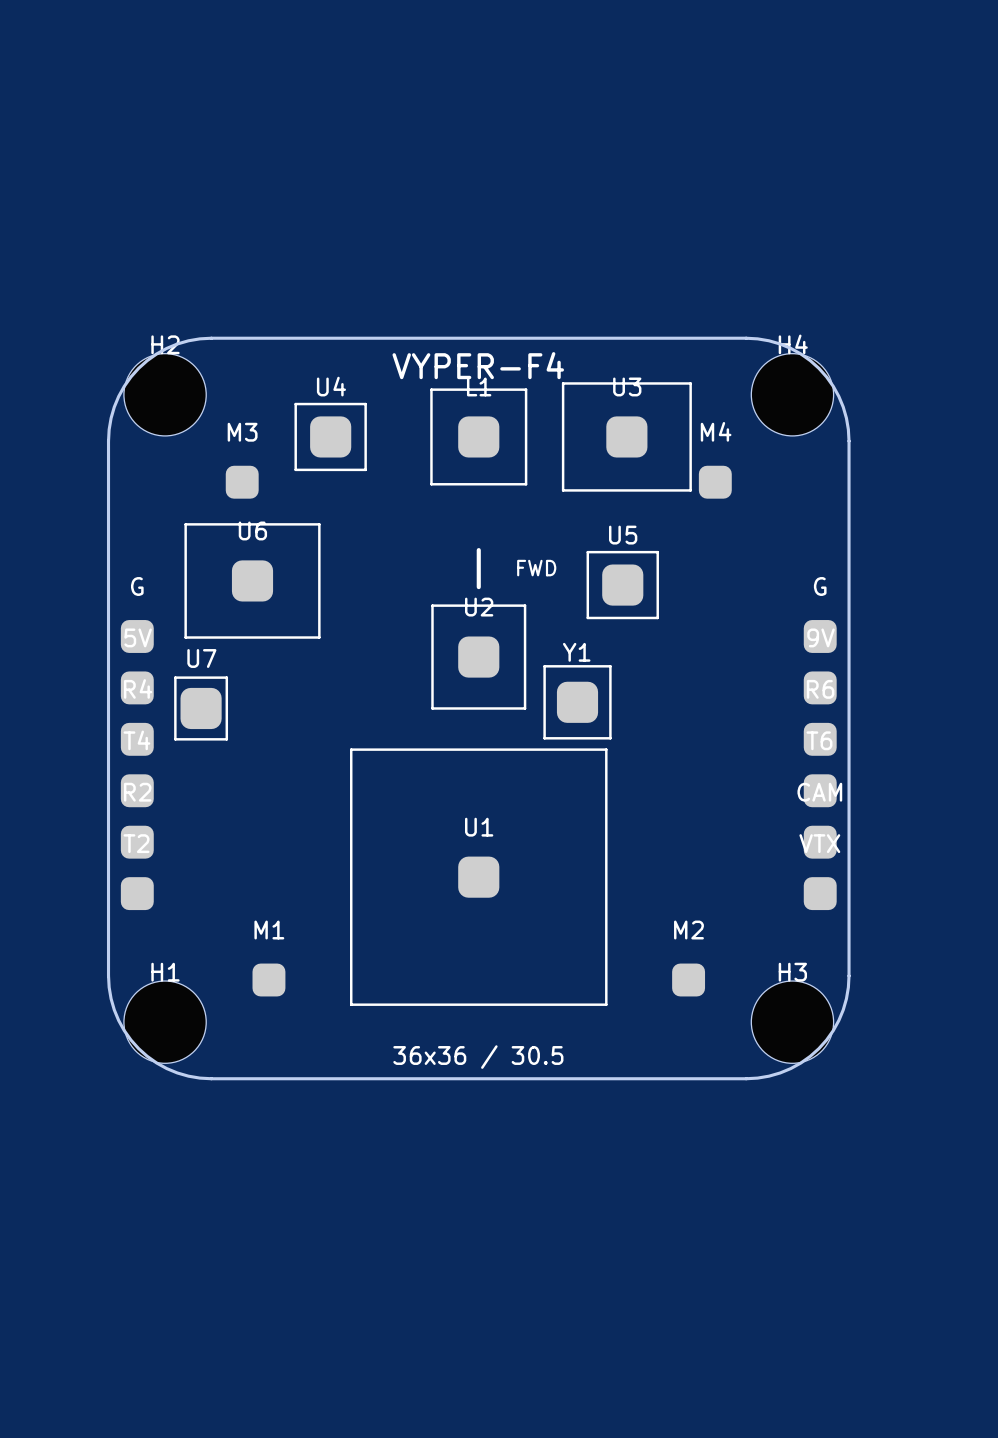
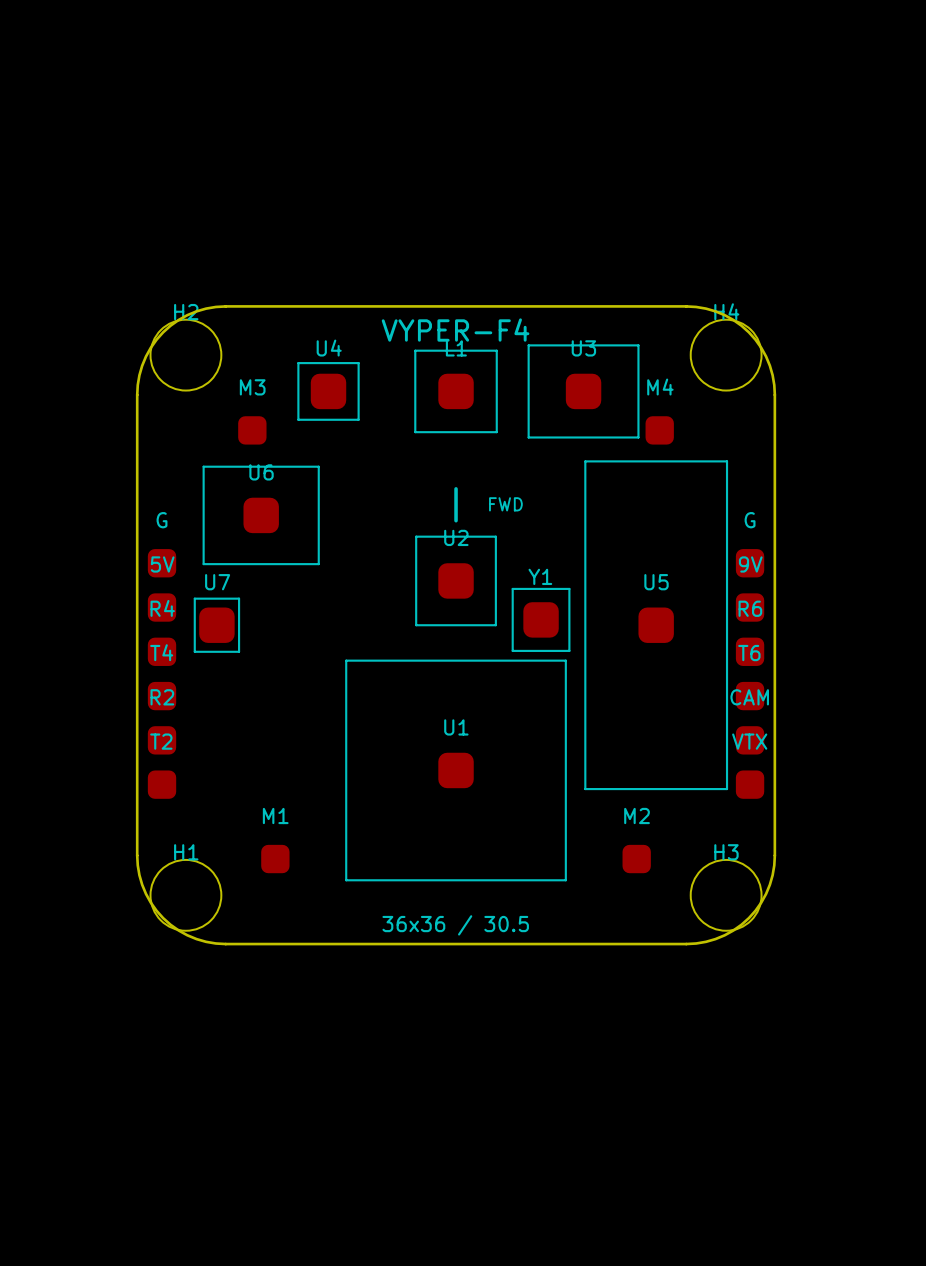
line: none -> (585, 461) (727, 461) (727, 789) (585, 789) (585, 461)
line: (587, 552) (657, 552) (657, 617) (587, 617) (587, 552) -> none
U5 position: (622, 585) -> (656, 625)

